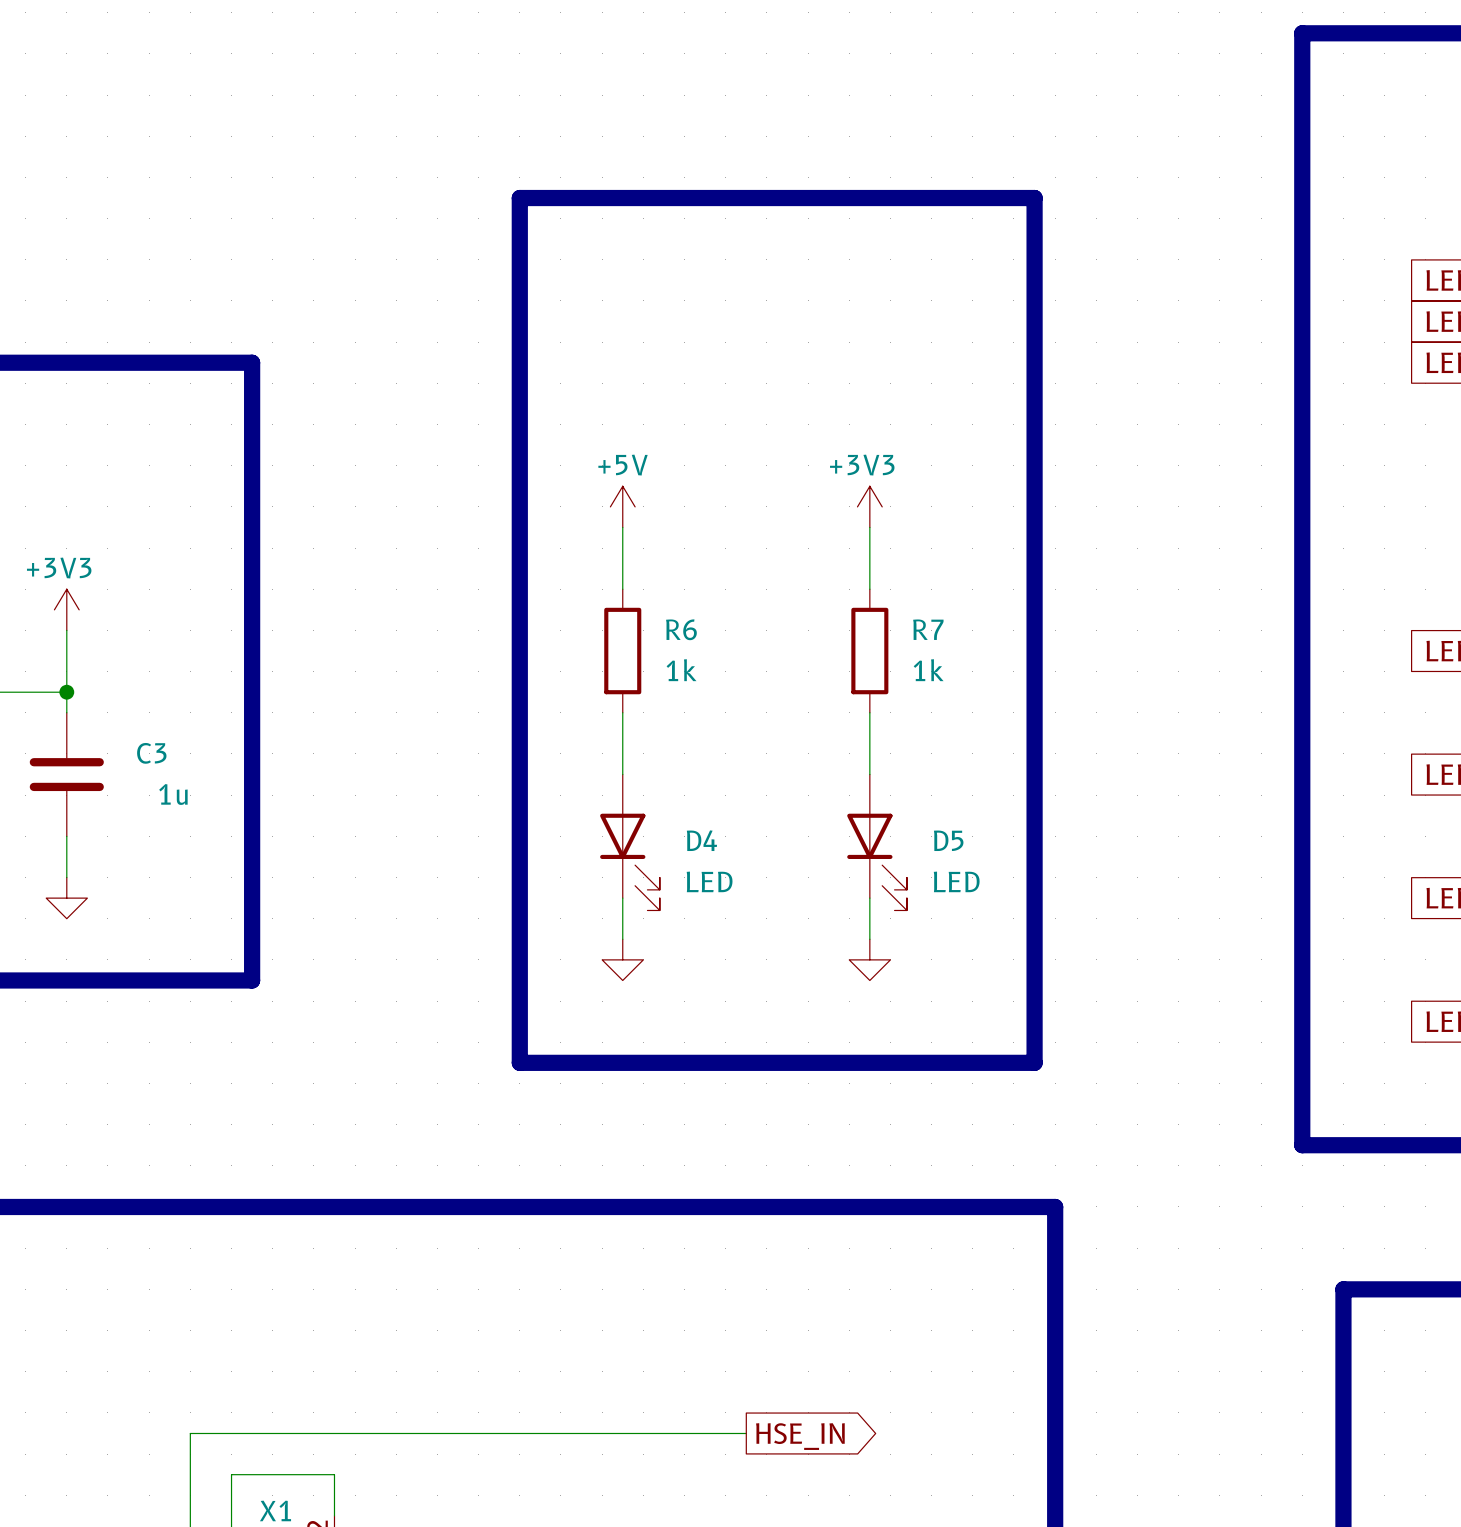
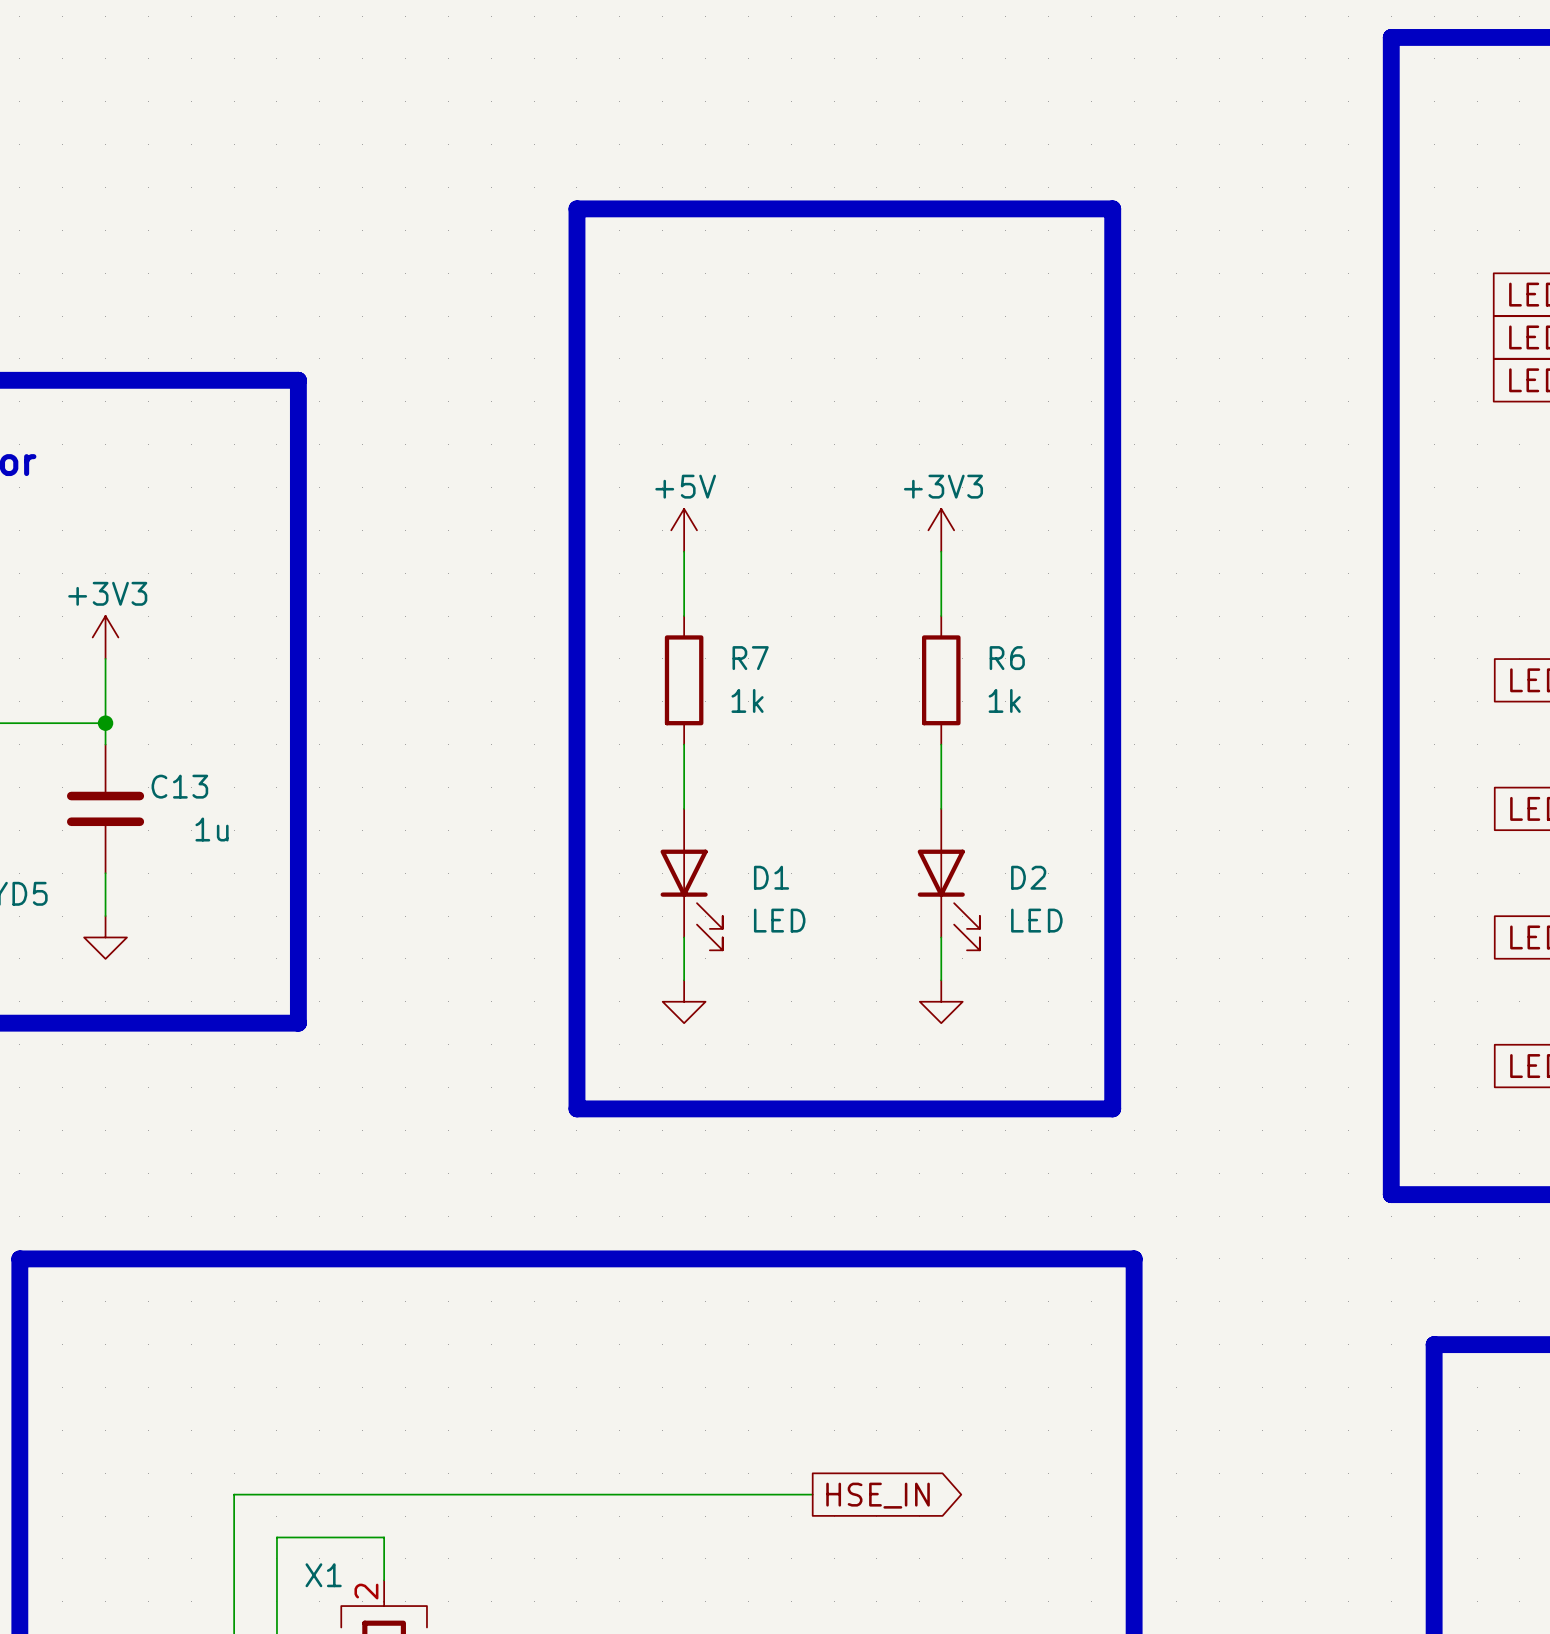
R6 name: R6 (681, 629) -> R7 (750, 658)
R7 name: R7 (928, 629) -> R6 (1007, 658)
C3 name: C3 (151, 753) -> C13 (179, 786)
D4 name: D4 (701, 840) -> D1 (771, 877)
D5 name: D5 (948, 840) -> D2 (1028, 877)

